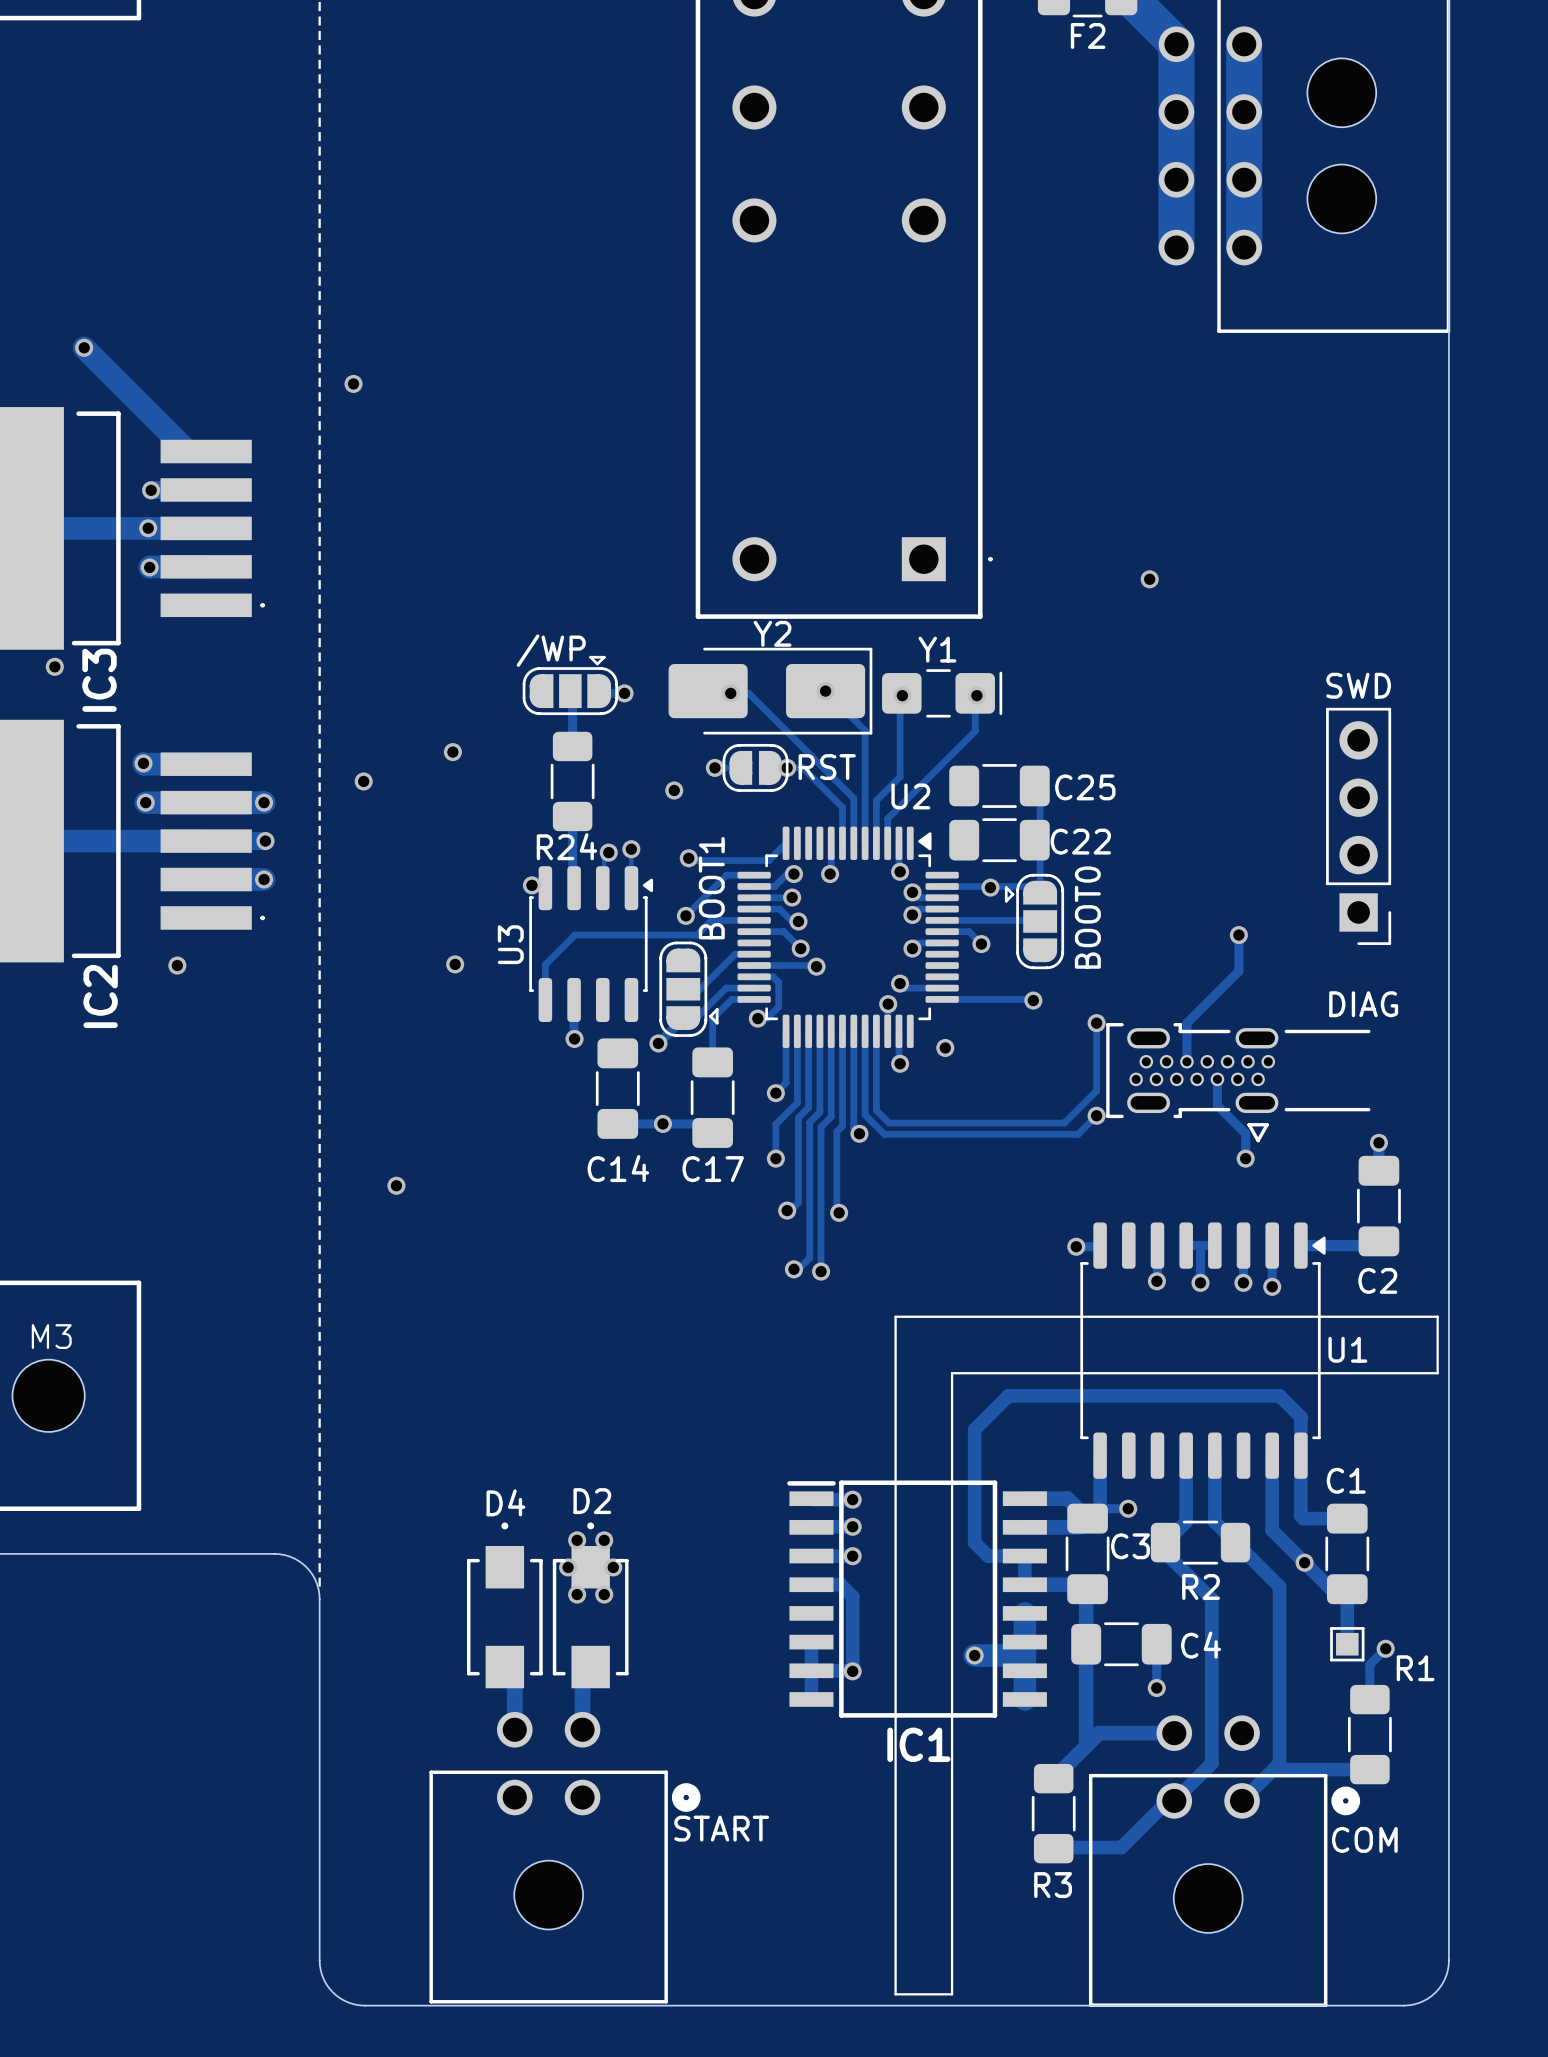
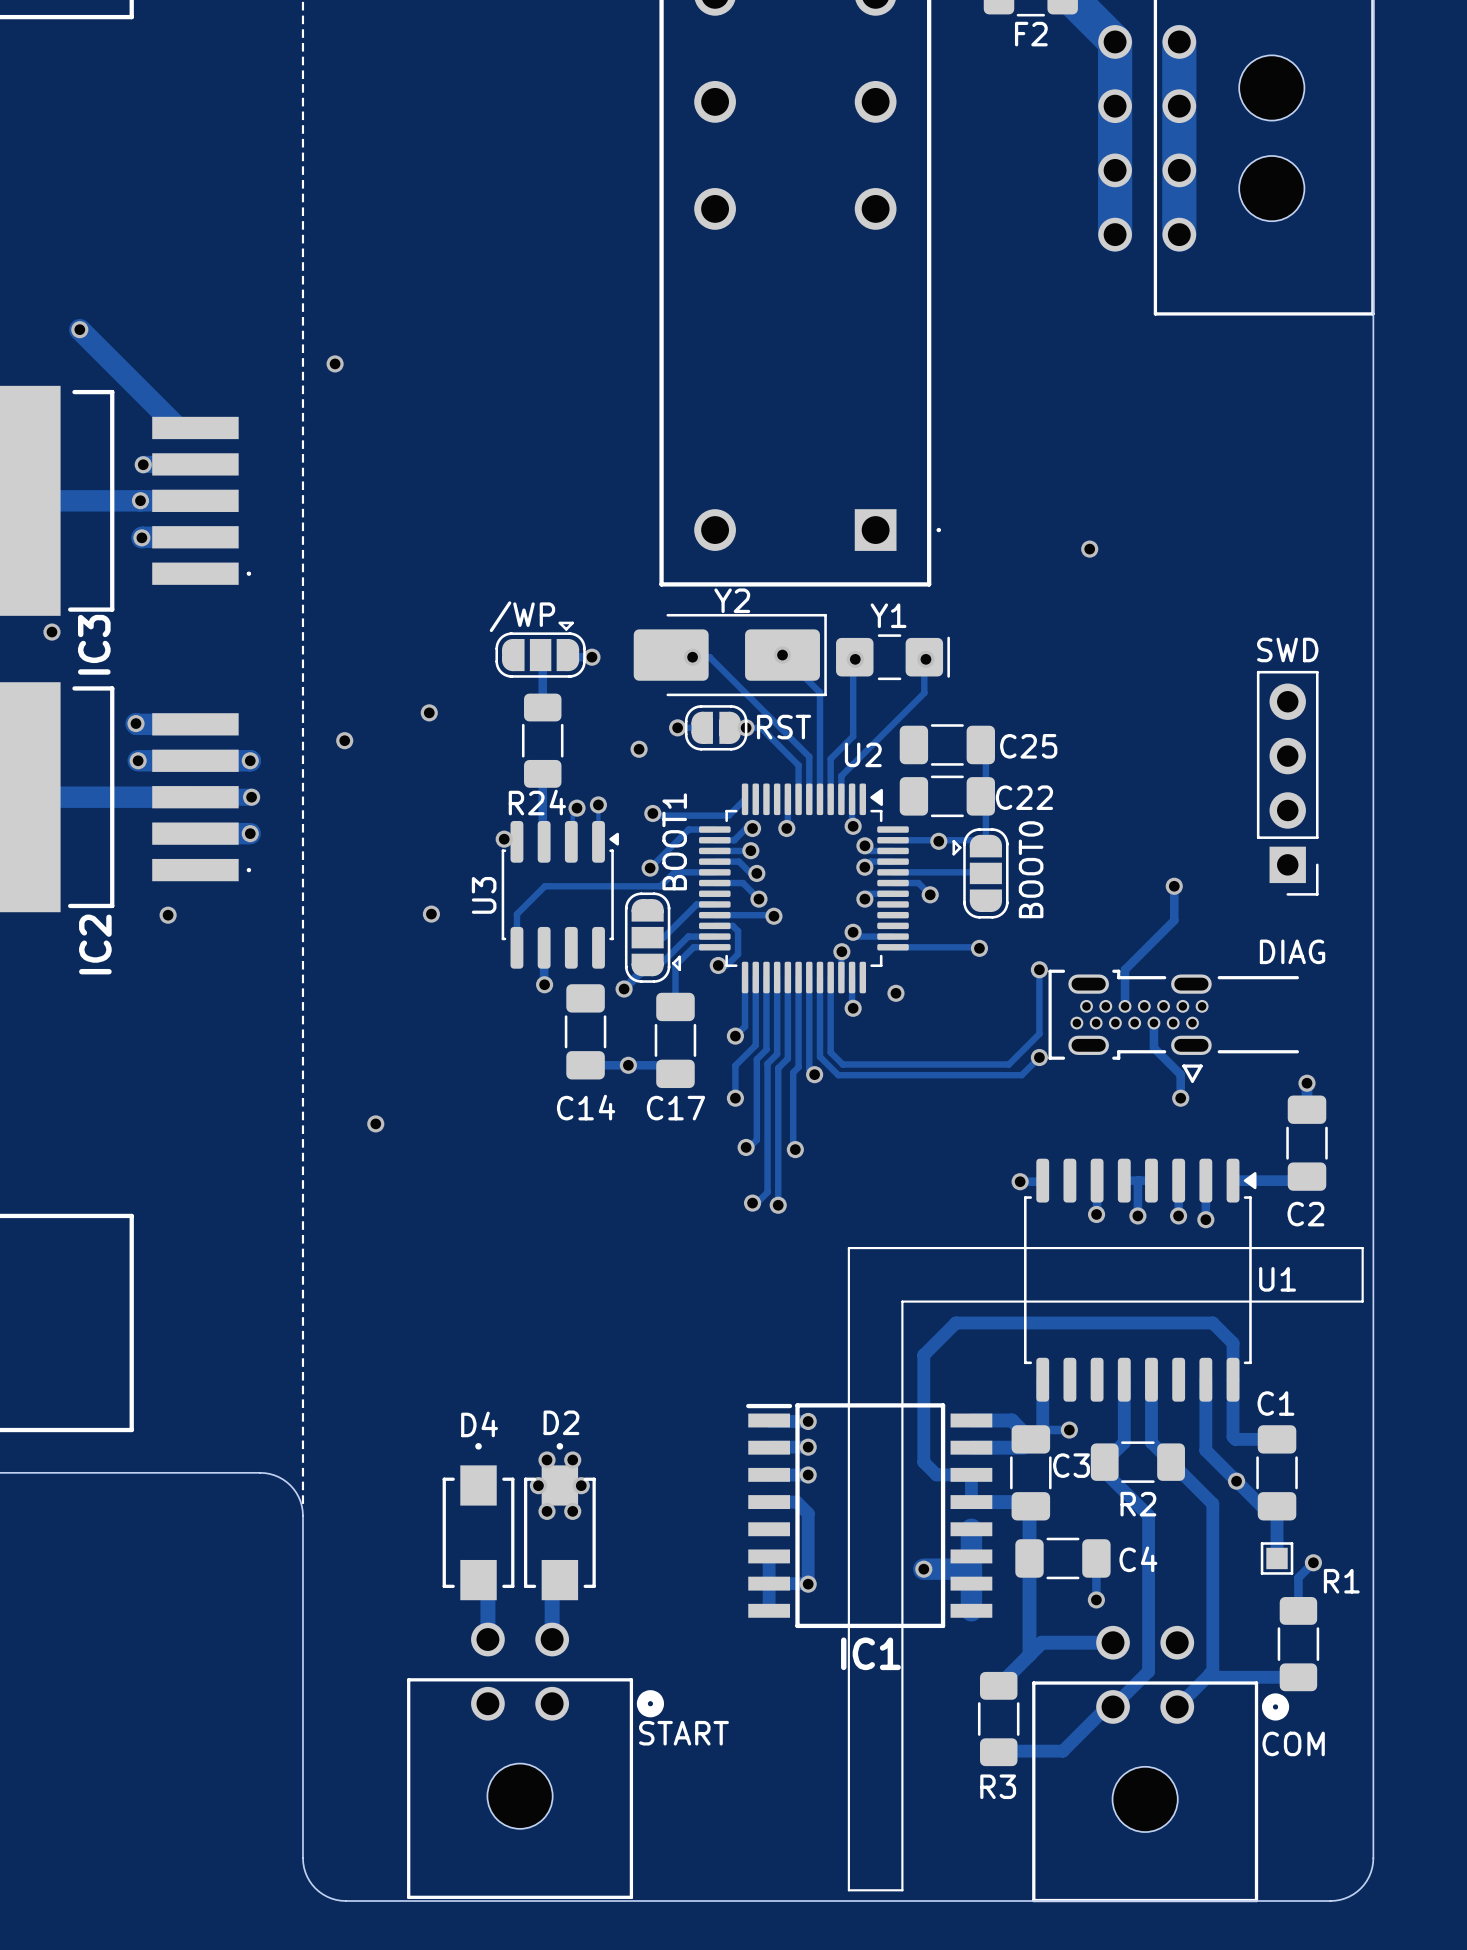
text: M3 (51, 1336) -> none
part: (48, 1395) -> none

